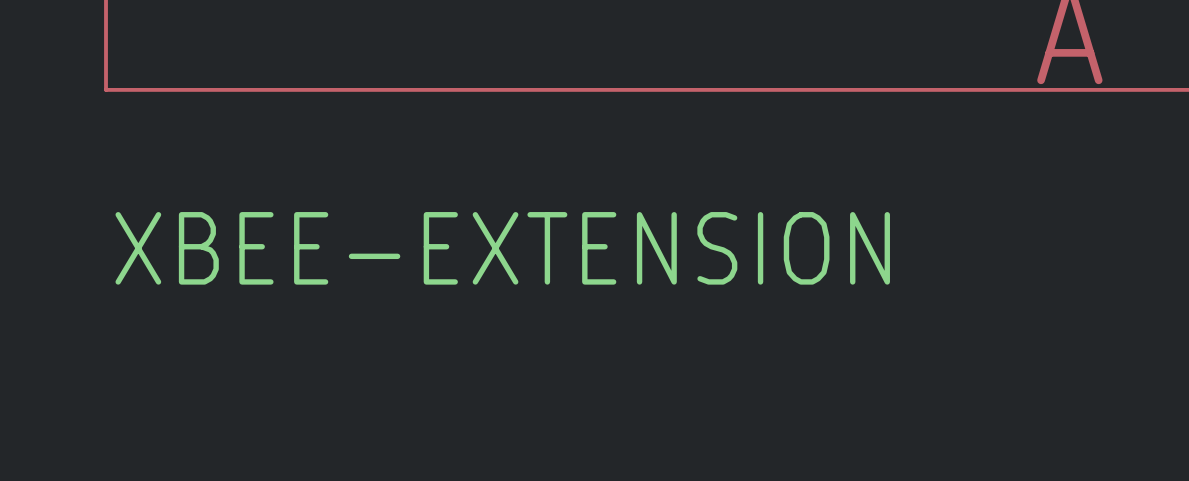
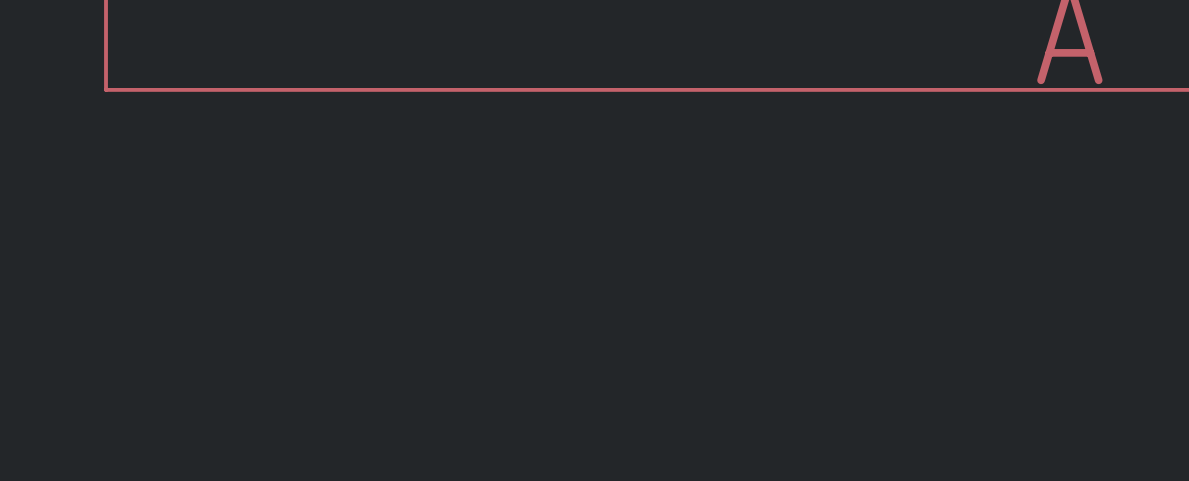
text: XBEE-EXTENSION (502, 248) -> none

